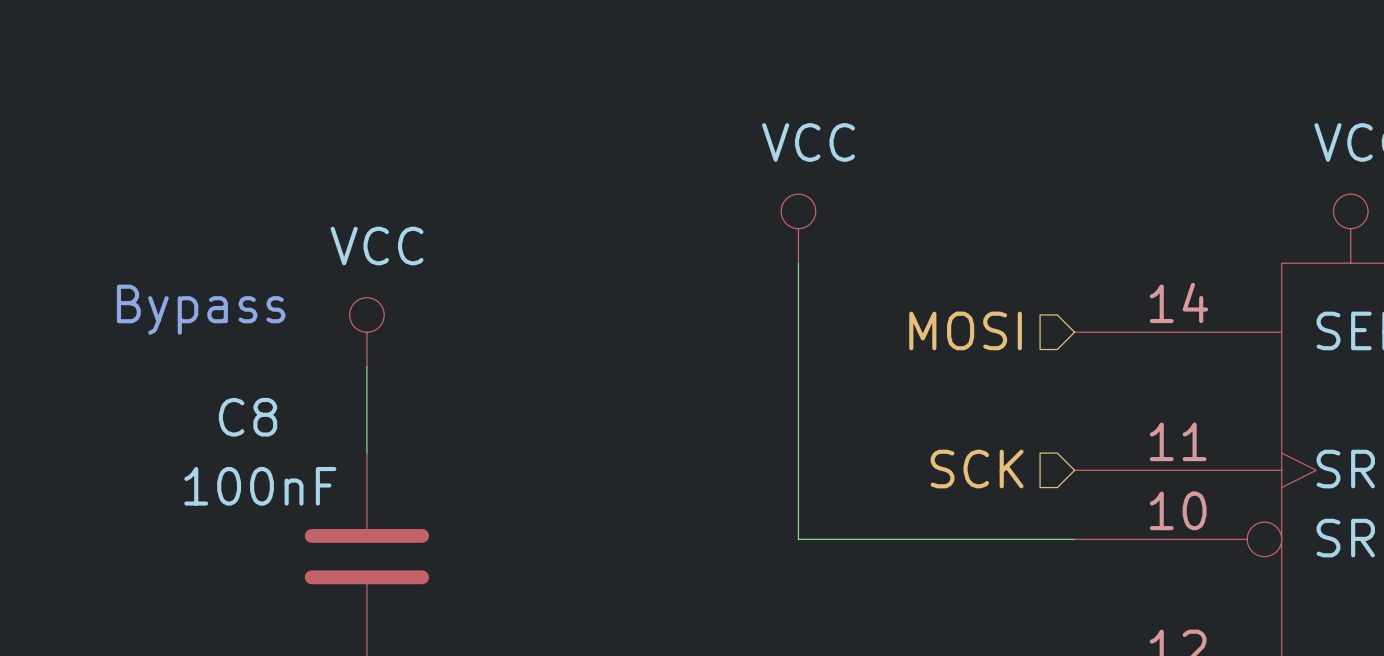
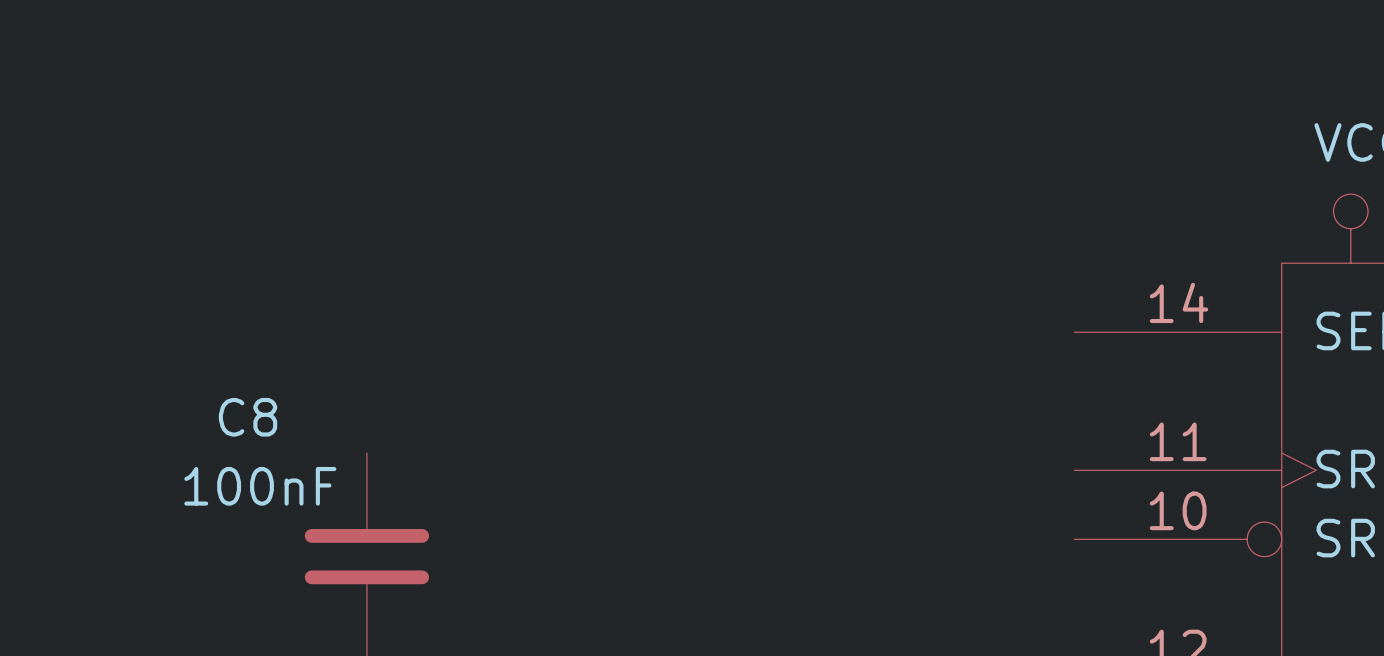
power symbol: VCC (798, 228) -> none
wire: (798, 263) (798, 539) (1074, 539) -> none
text: Bypass (201, 309) -> none
hierarchical label: MOSI (965, 330) -> none
power symbol: VCC (366, 332) -> none
wire: (366, 366) (366, 453) -> none
hierarchical label: SCK (977, 469) -> none

